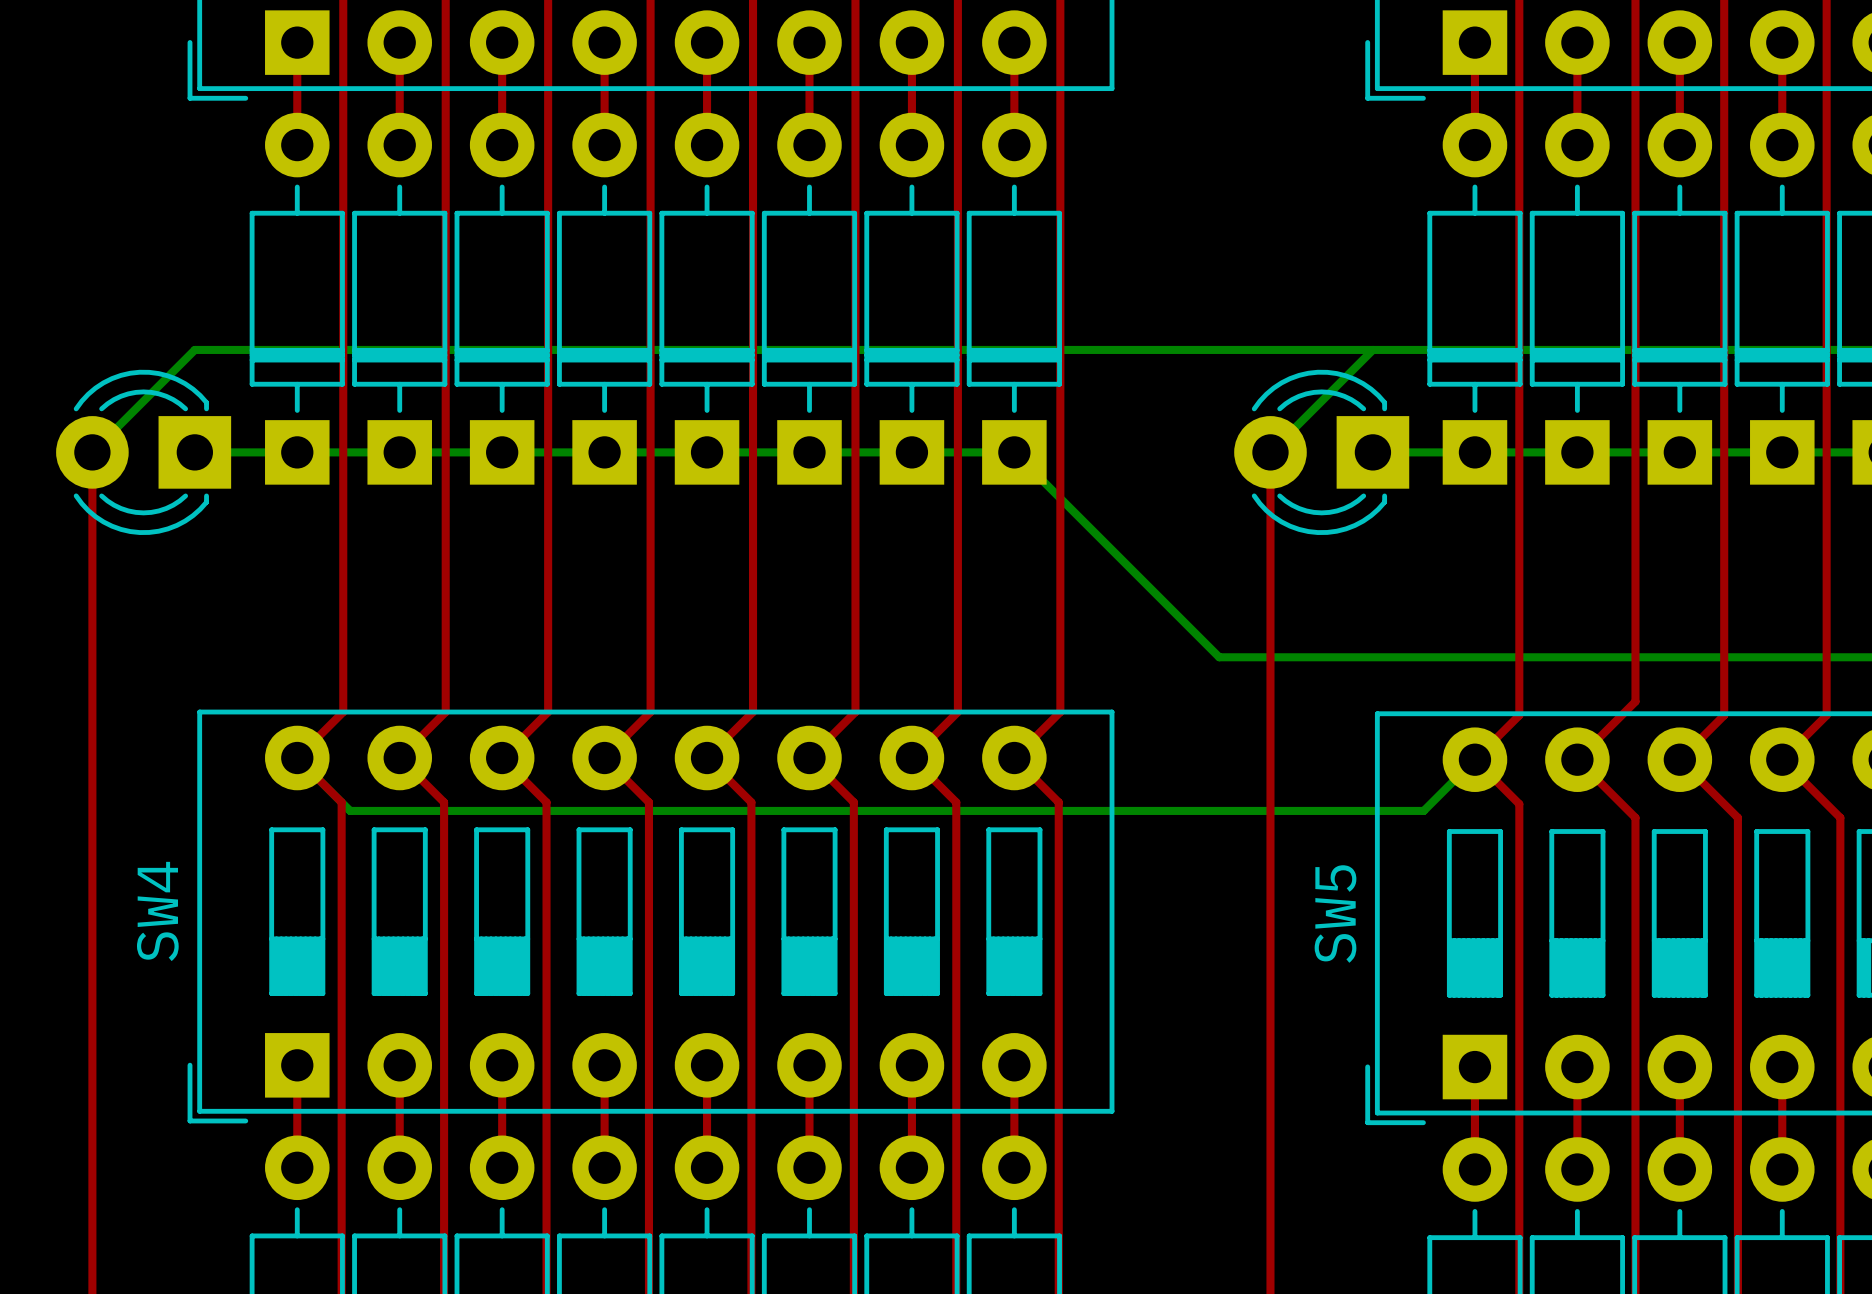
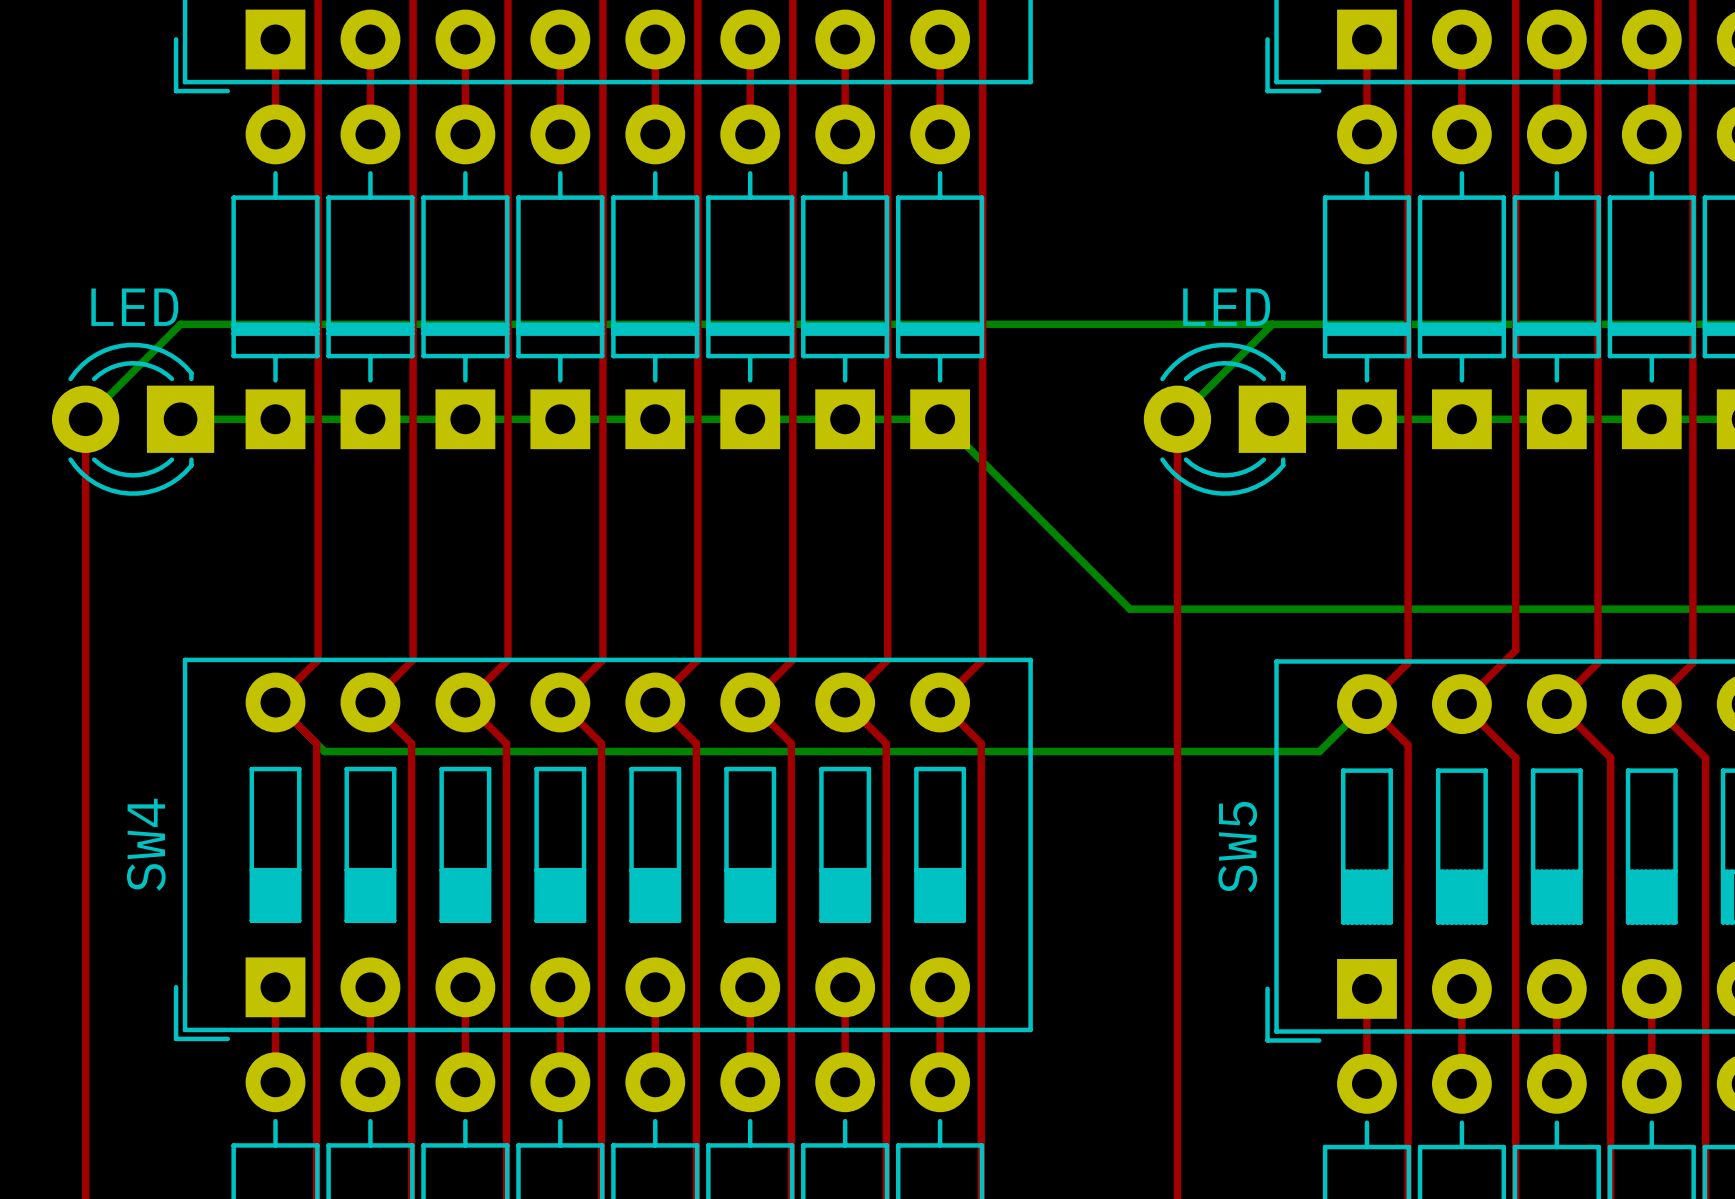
part value: none -> LED (134, 307)
part value: none -> LED (1226, 307)

